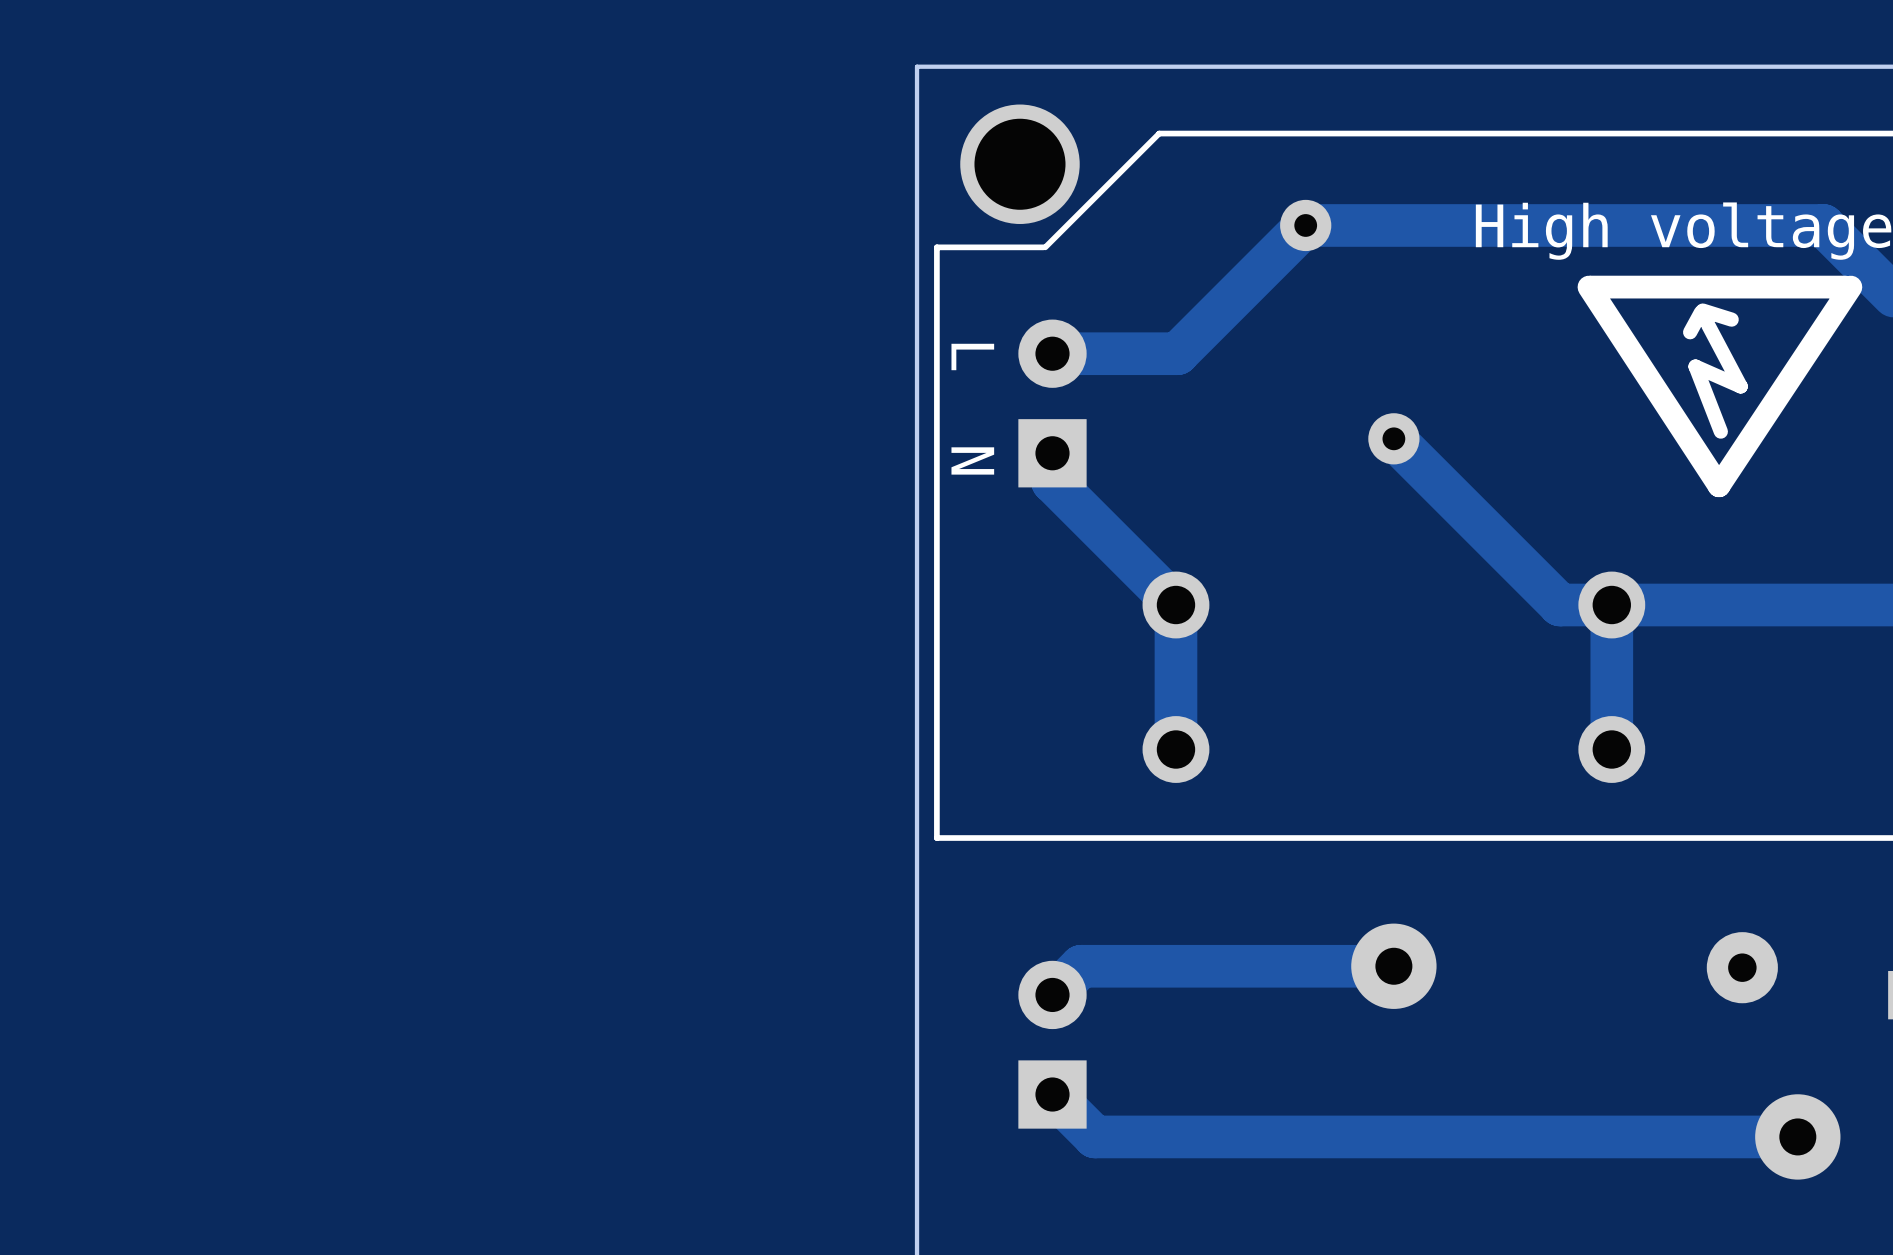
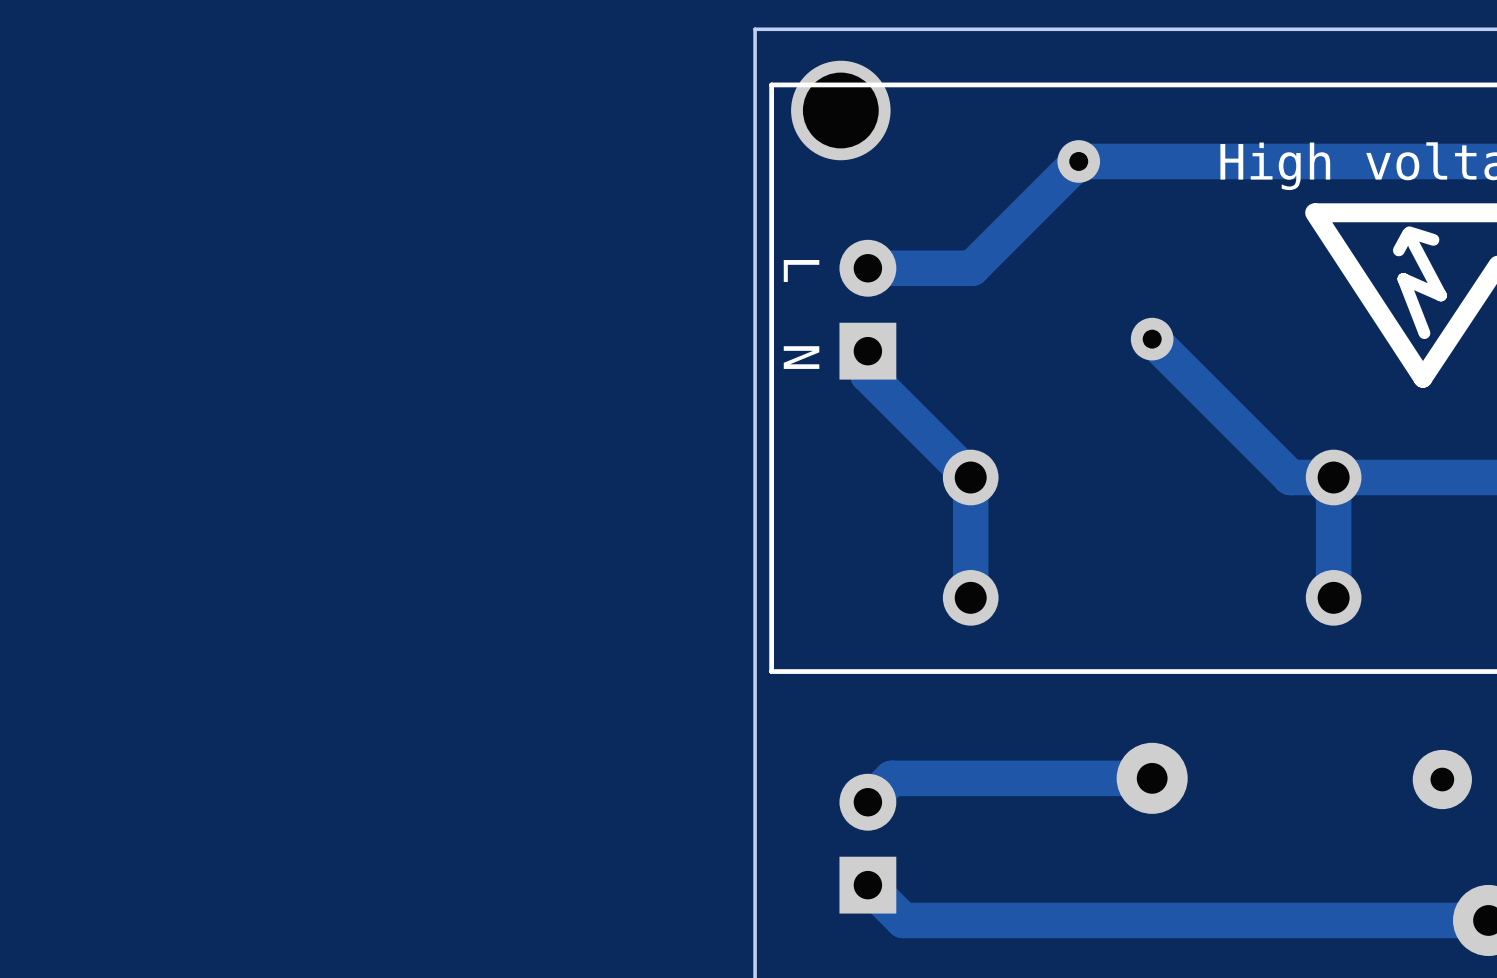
line: (1159, 133) (1045, 247) -> (956, 84) (771, 84) (771, 179)
line: (1043, 247) (936, 247) -> none

